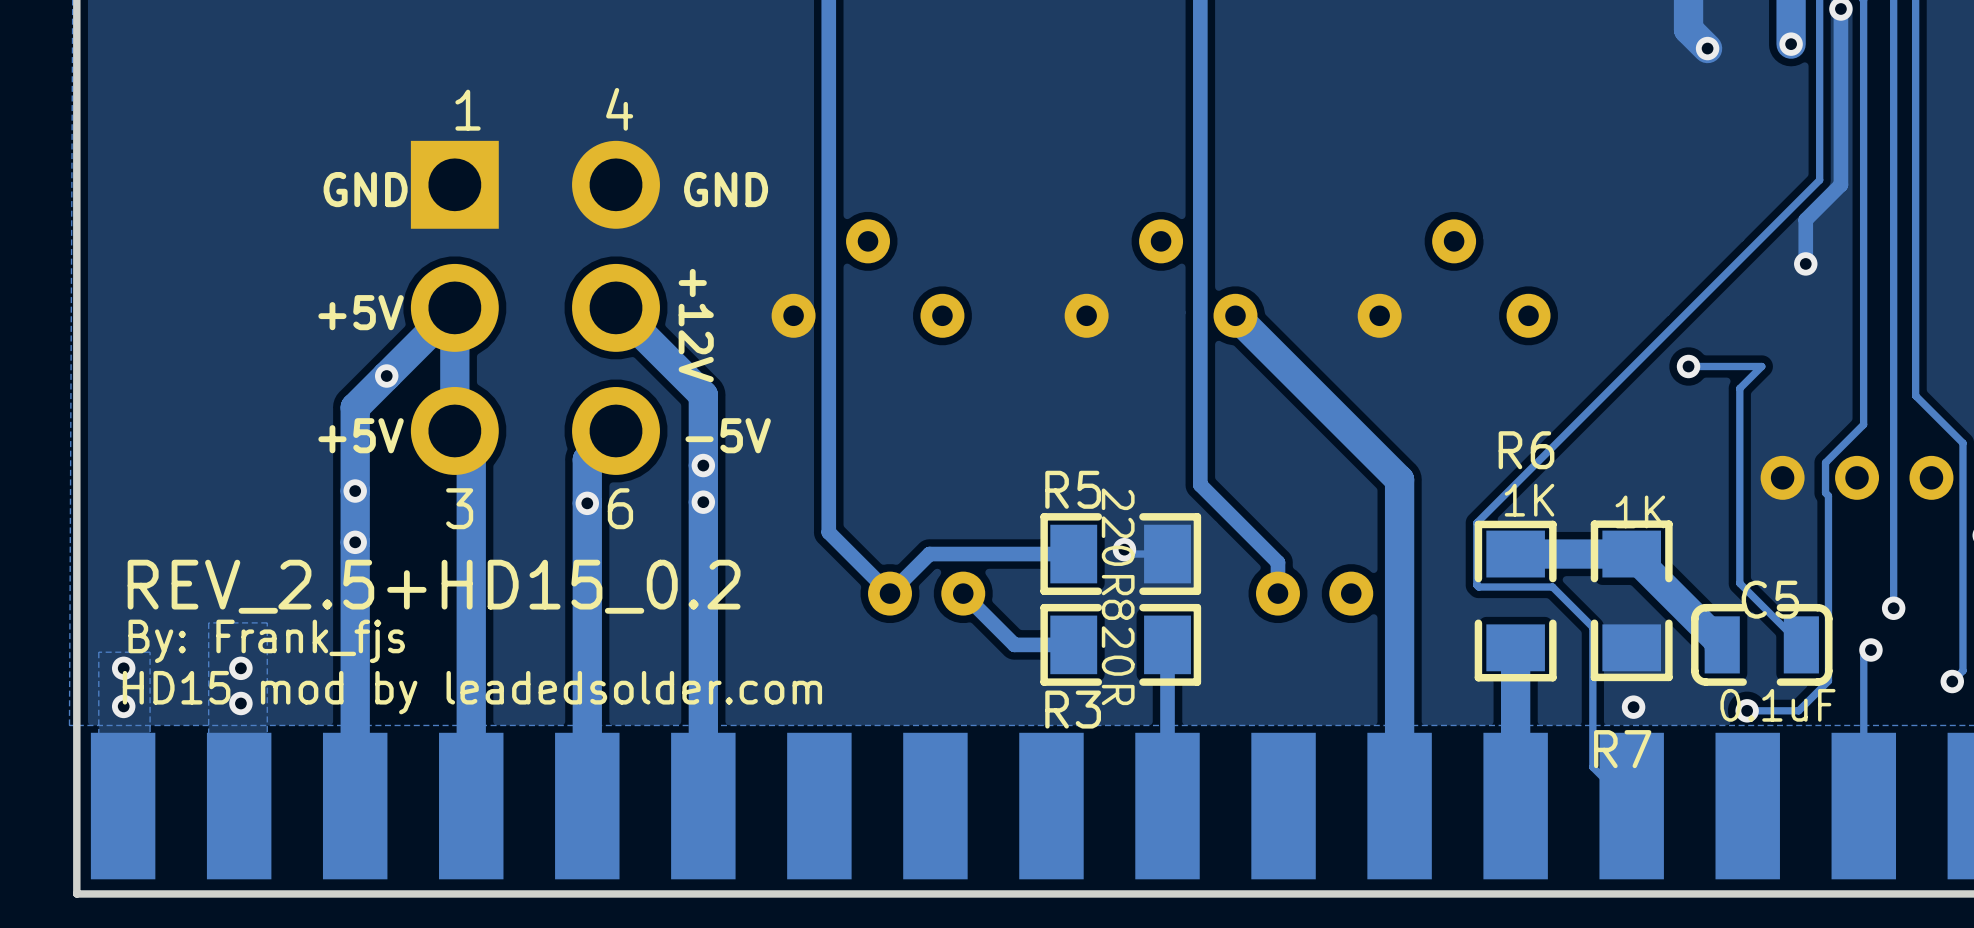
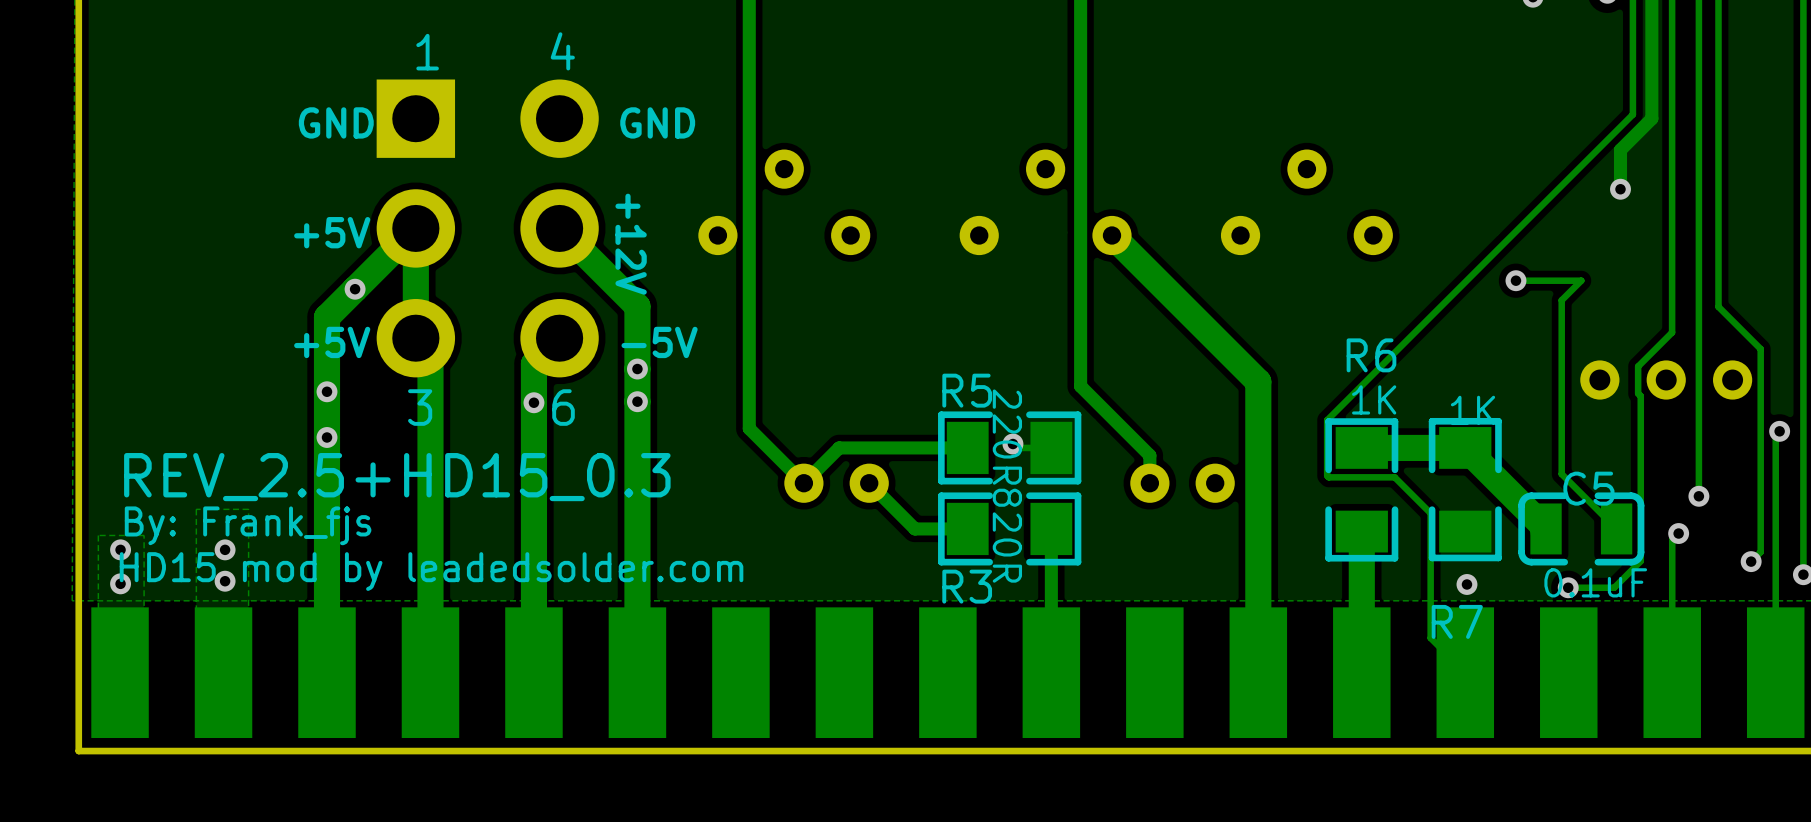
text: REV_2.5+HD15_0.2 (434, 586) -> REV_2.5+HD15_0.3 (397, 477)

